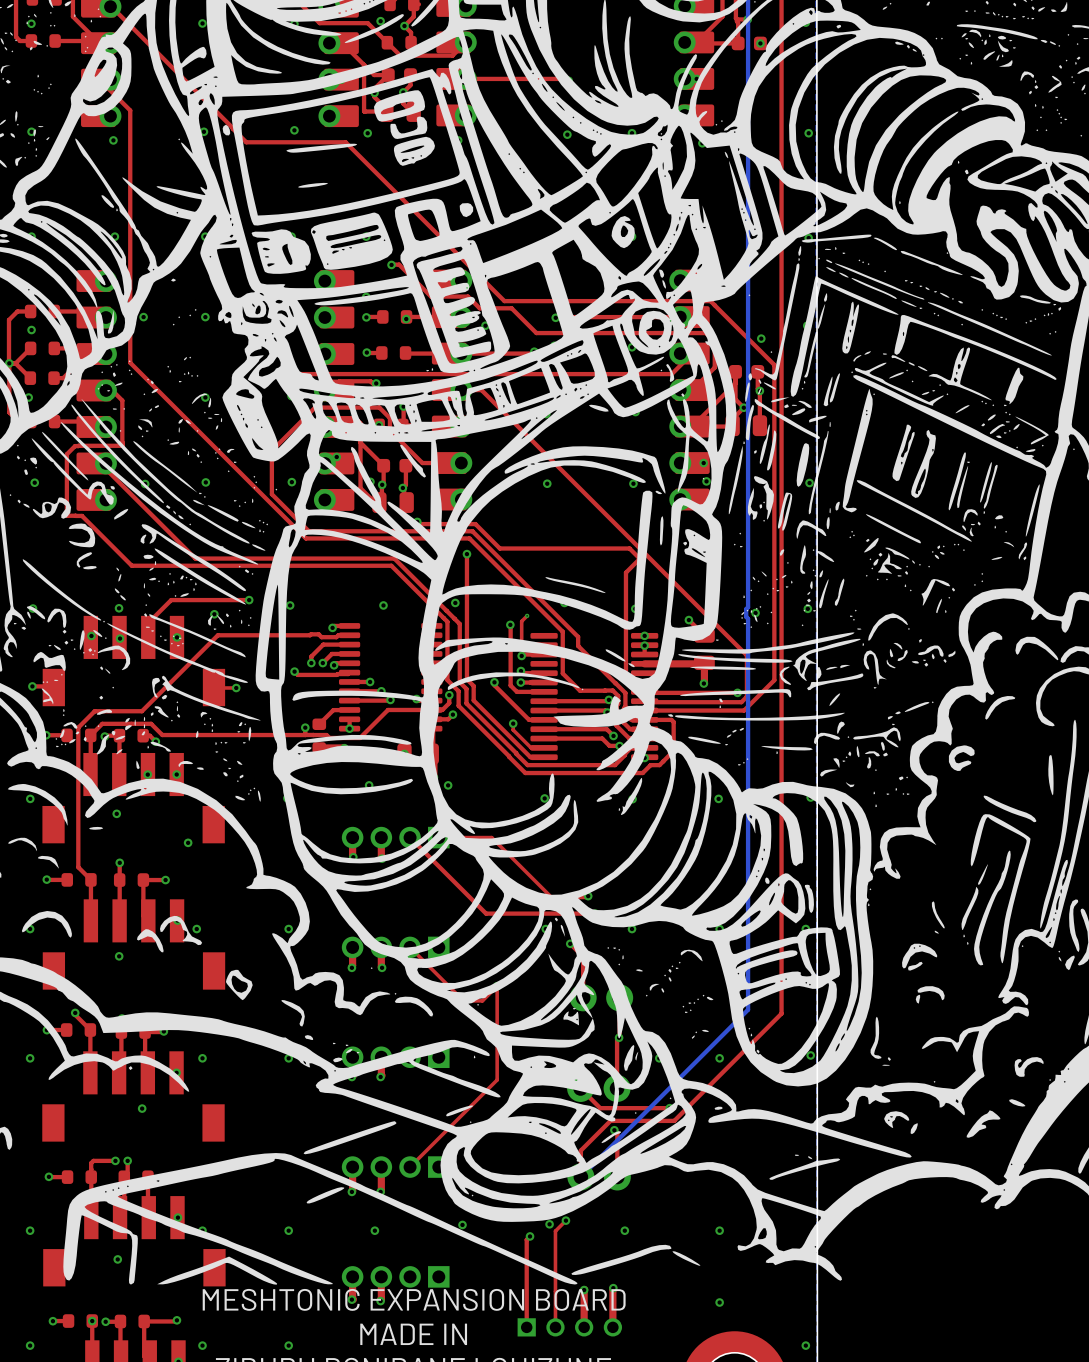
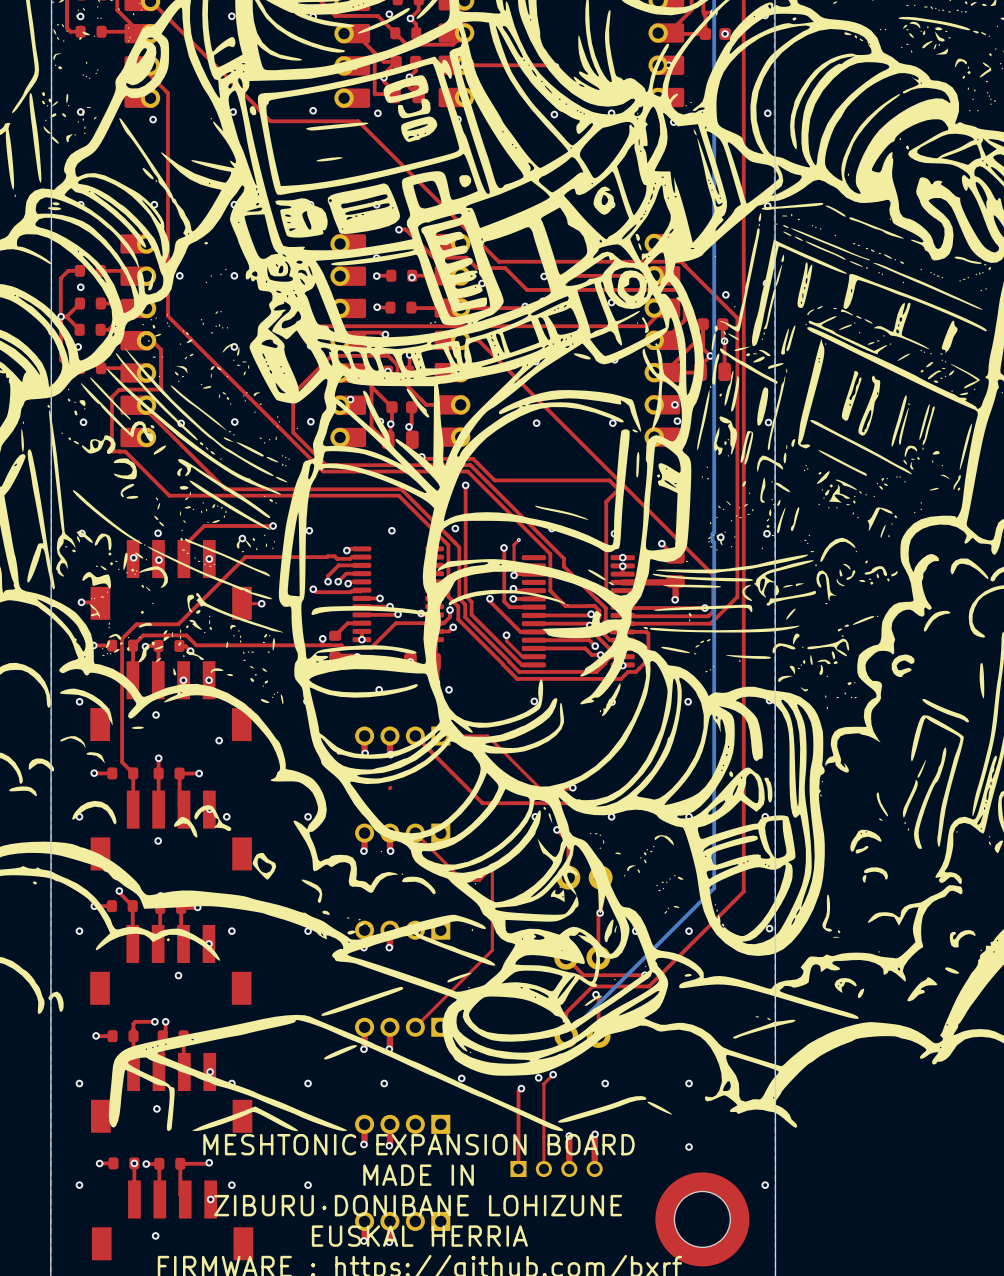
top track: none -> (390, 787) (389, 788)

